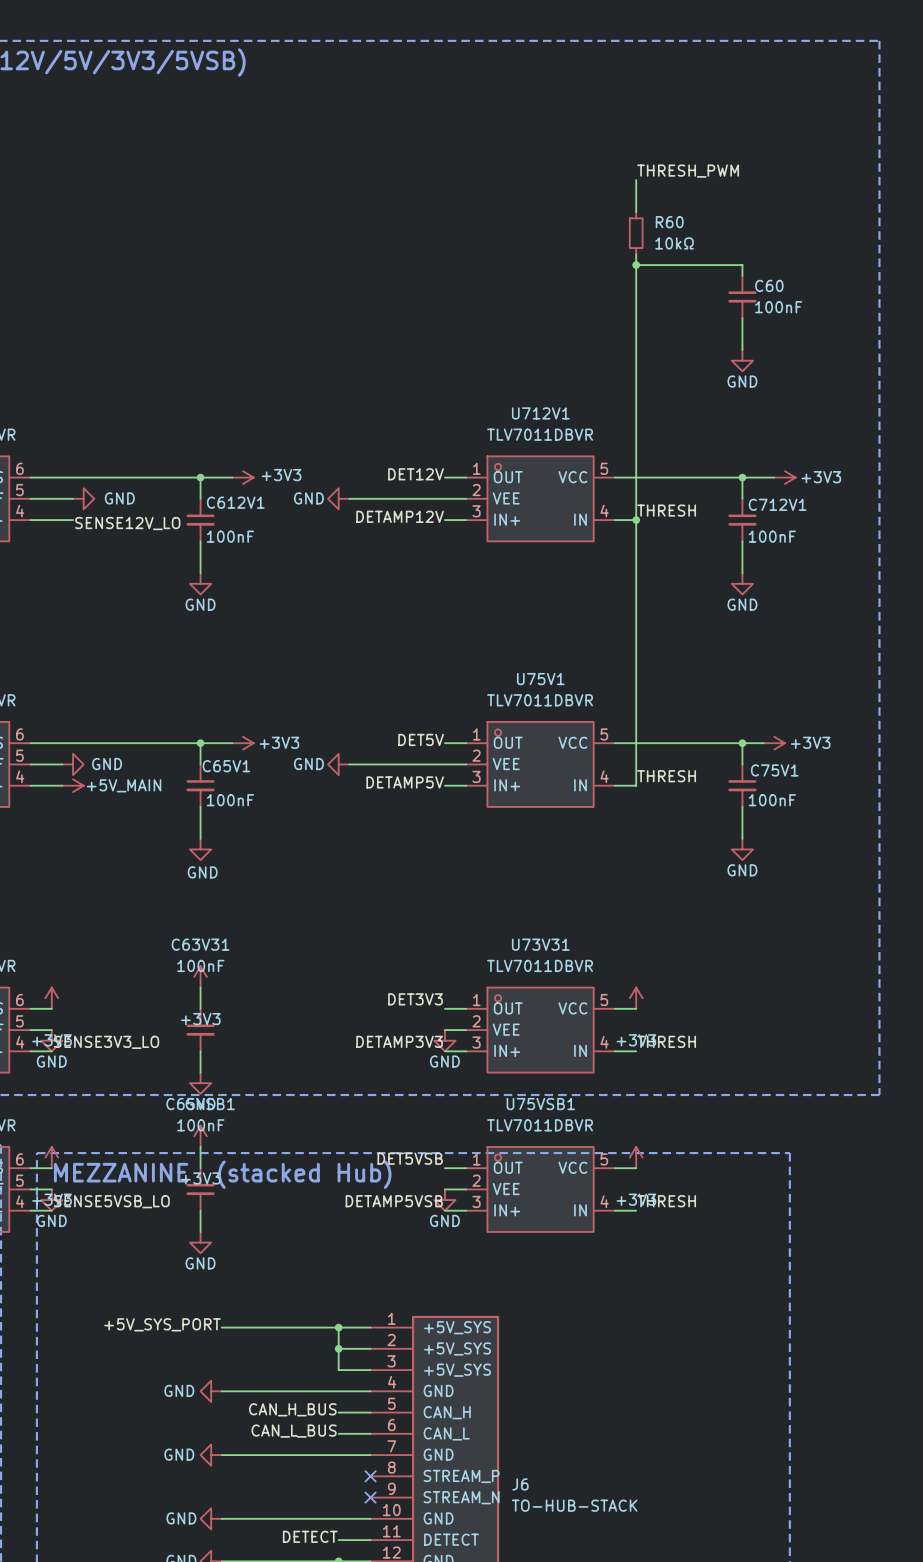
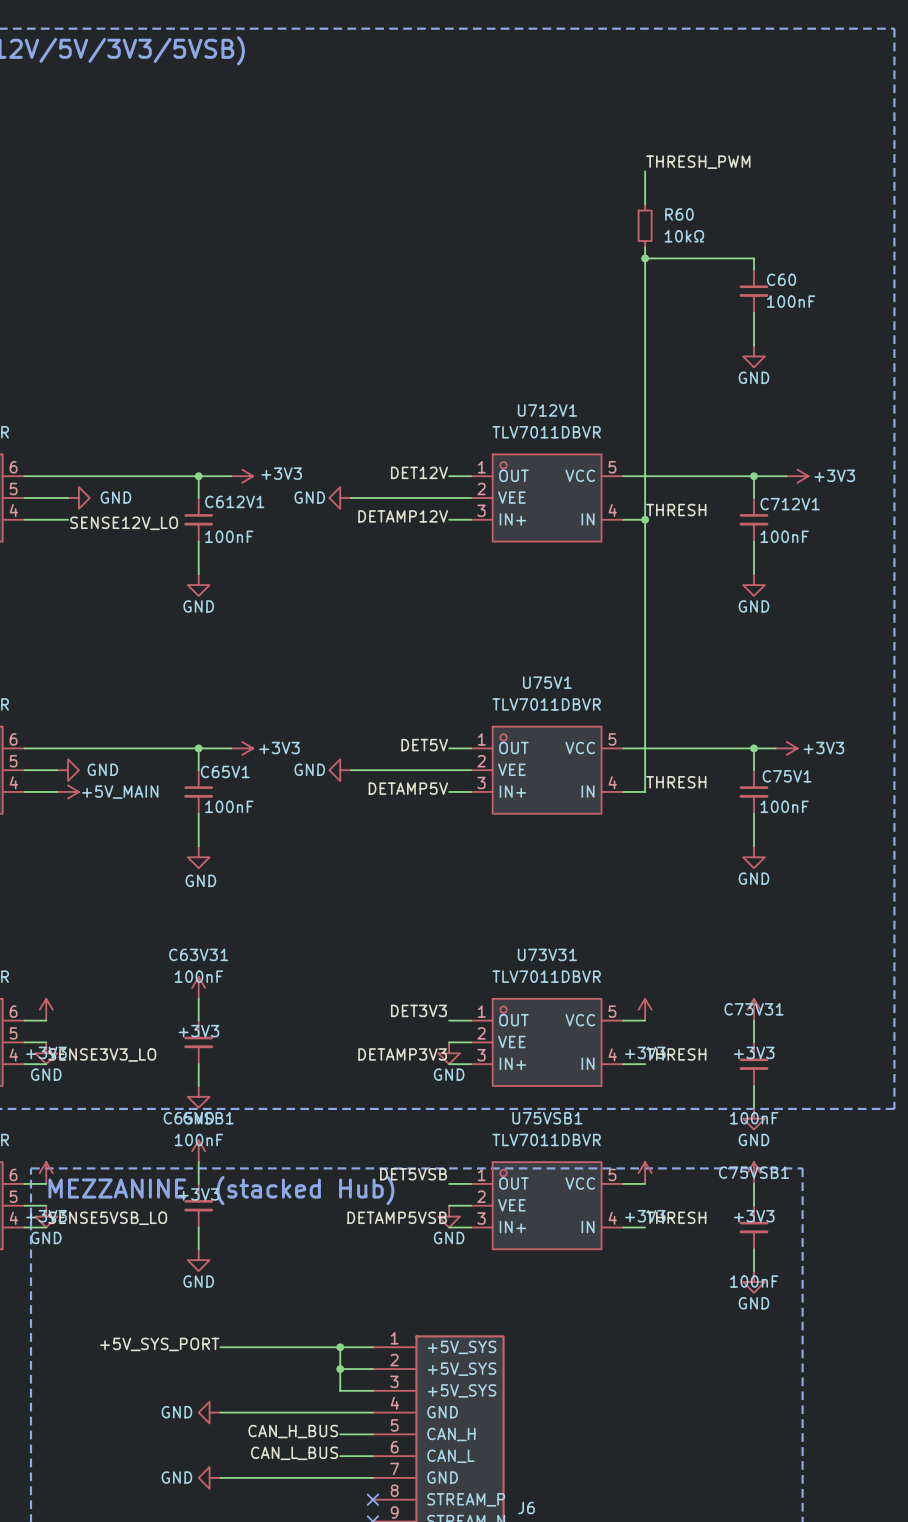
power symbol: none -> +3V3 (753, 1009)
wire: none -> (753, 1020) (753, 1042)
C73V31: none -> 100nF (753, 1064)
wire: none -> (753, 1085) (753, 1107)
power symbol: none -> GND (753, 1118)
power symbol: none -> +3V3 (753, 1173)
wire: none -> (753, 1183) (753, 1205)
C75VSB1: none -> 100nF (753, 1227)
wire: none -> (753, 1249) (753, 1271)
power symbol: none -> GND (753, 1281)

